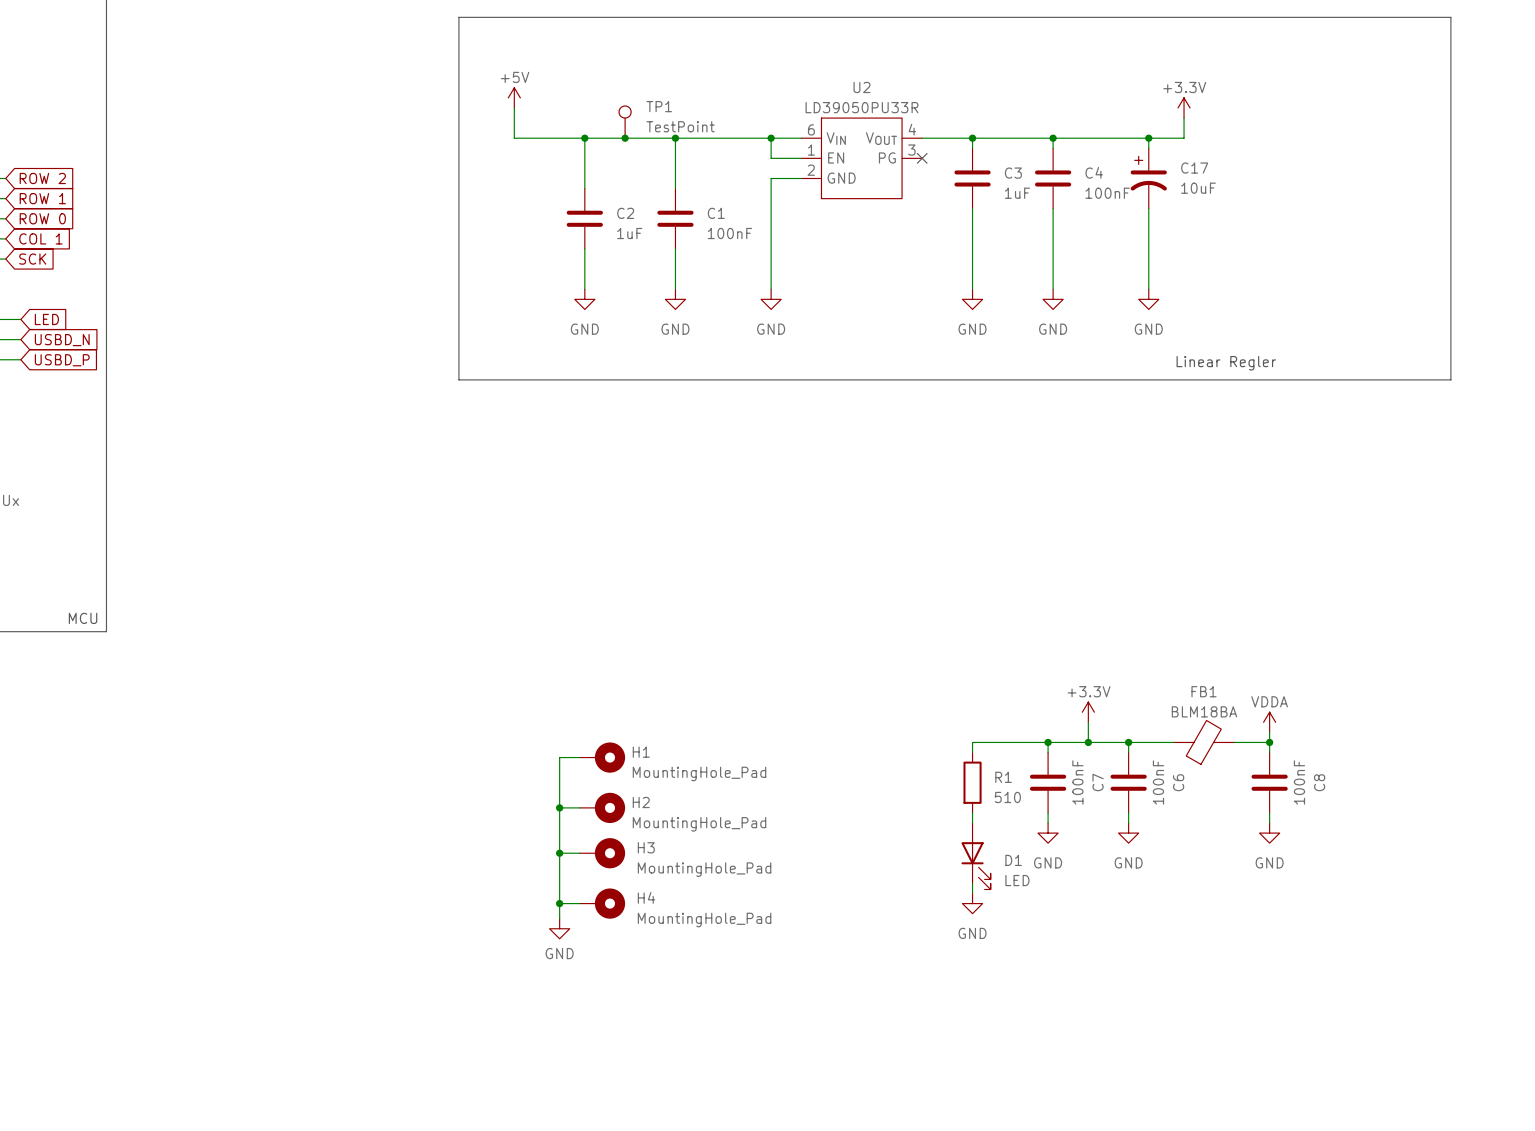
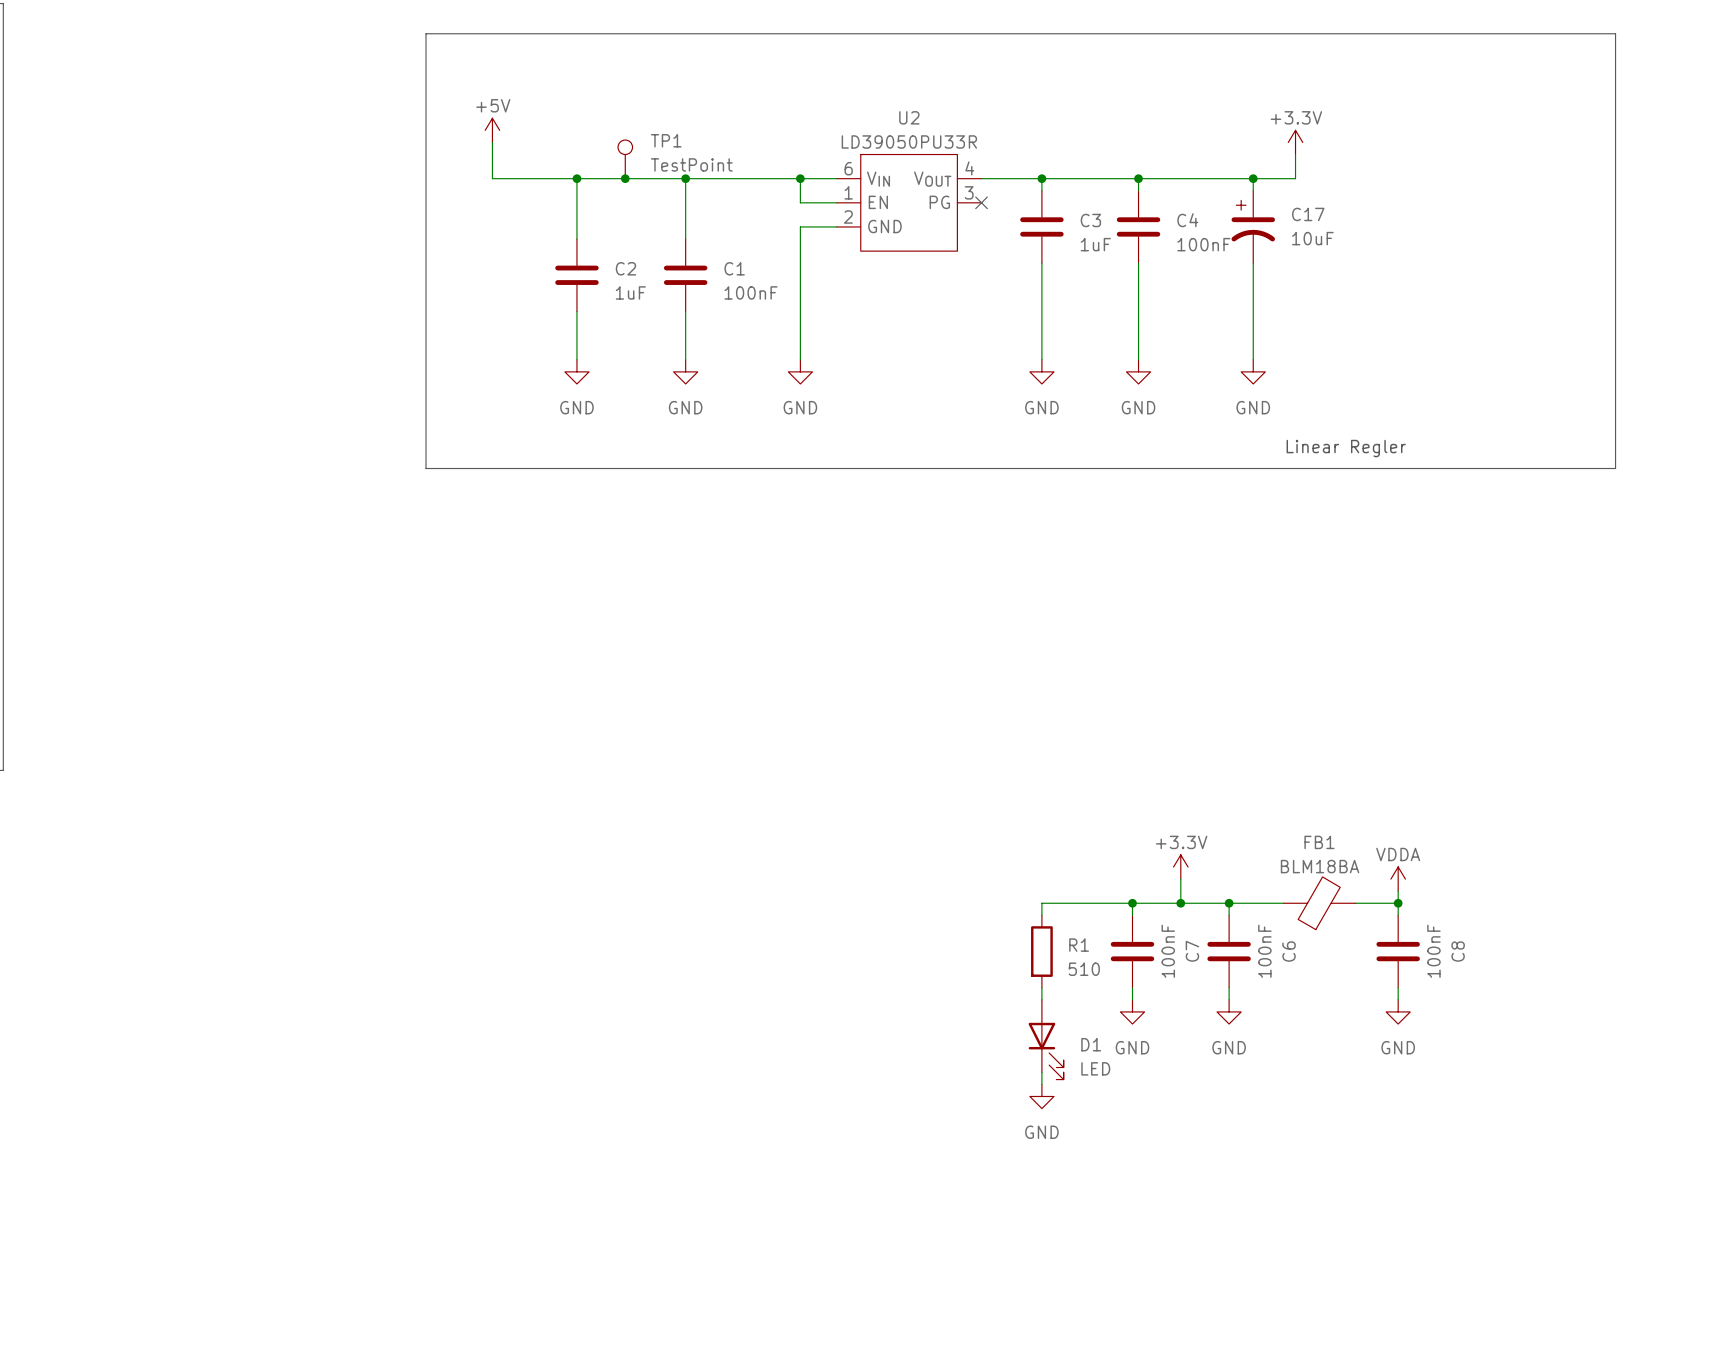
wire: (579, 757) (559, 757) (559, 918) -> none
H1: MountingHole_Pad (602, 757) -> none
wire: (559, 807) (579, 807) -> none
junction: (559, 807) -> none
H2: MountingHole_Pad (602, 807) -> none
wire: (559, 853) (579, 853) -> none
junction: (559, 853) -> none
H3: MountingHole_Pad (602, 853) -> none
wire: (559, 903) (579, 903) -> none
junction: (559, 903) -> none
H4: MountingHole_Pad (602, 903) -> none
power symbol: GND (559, 928) -> none

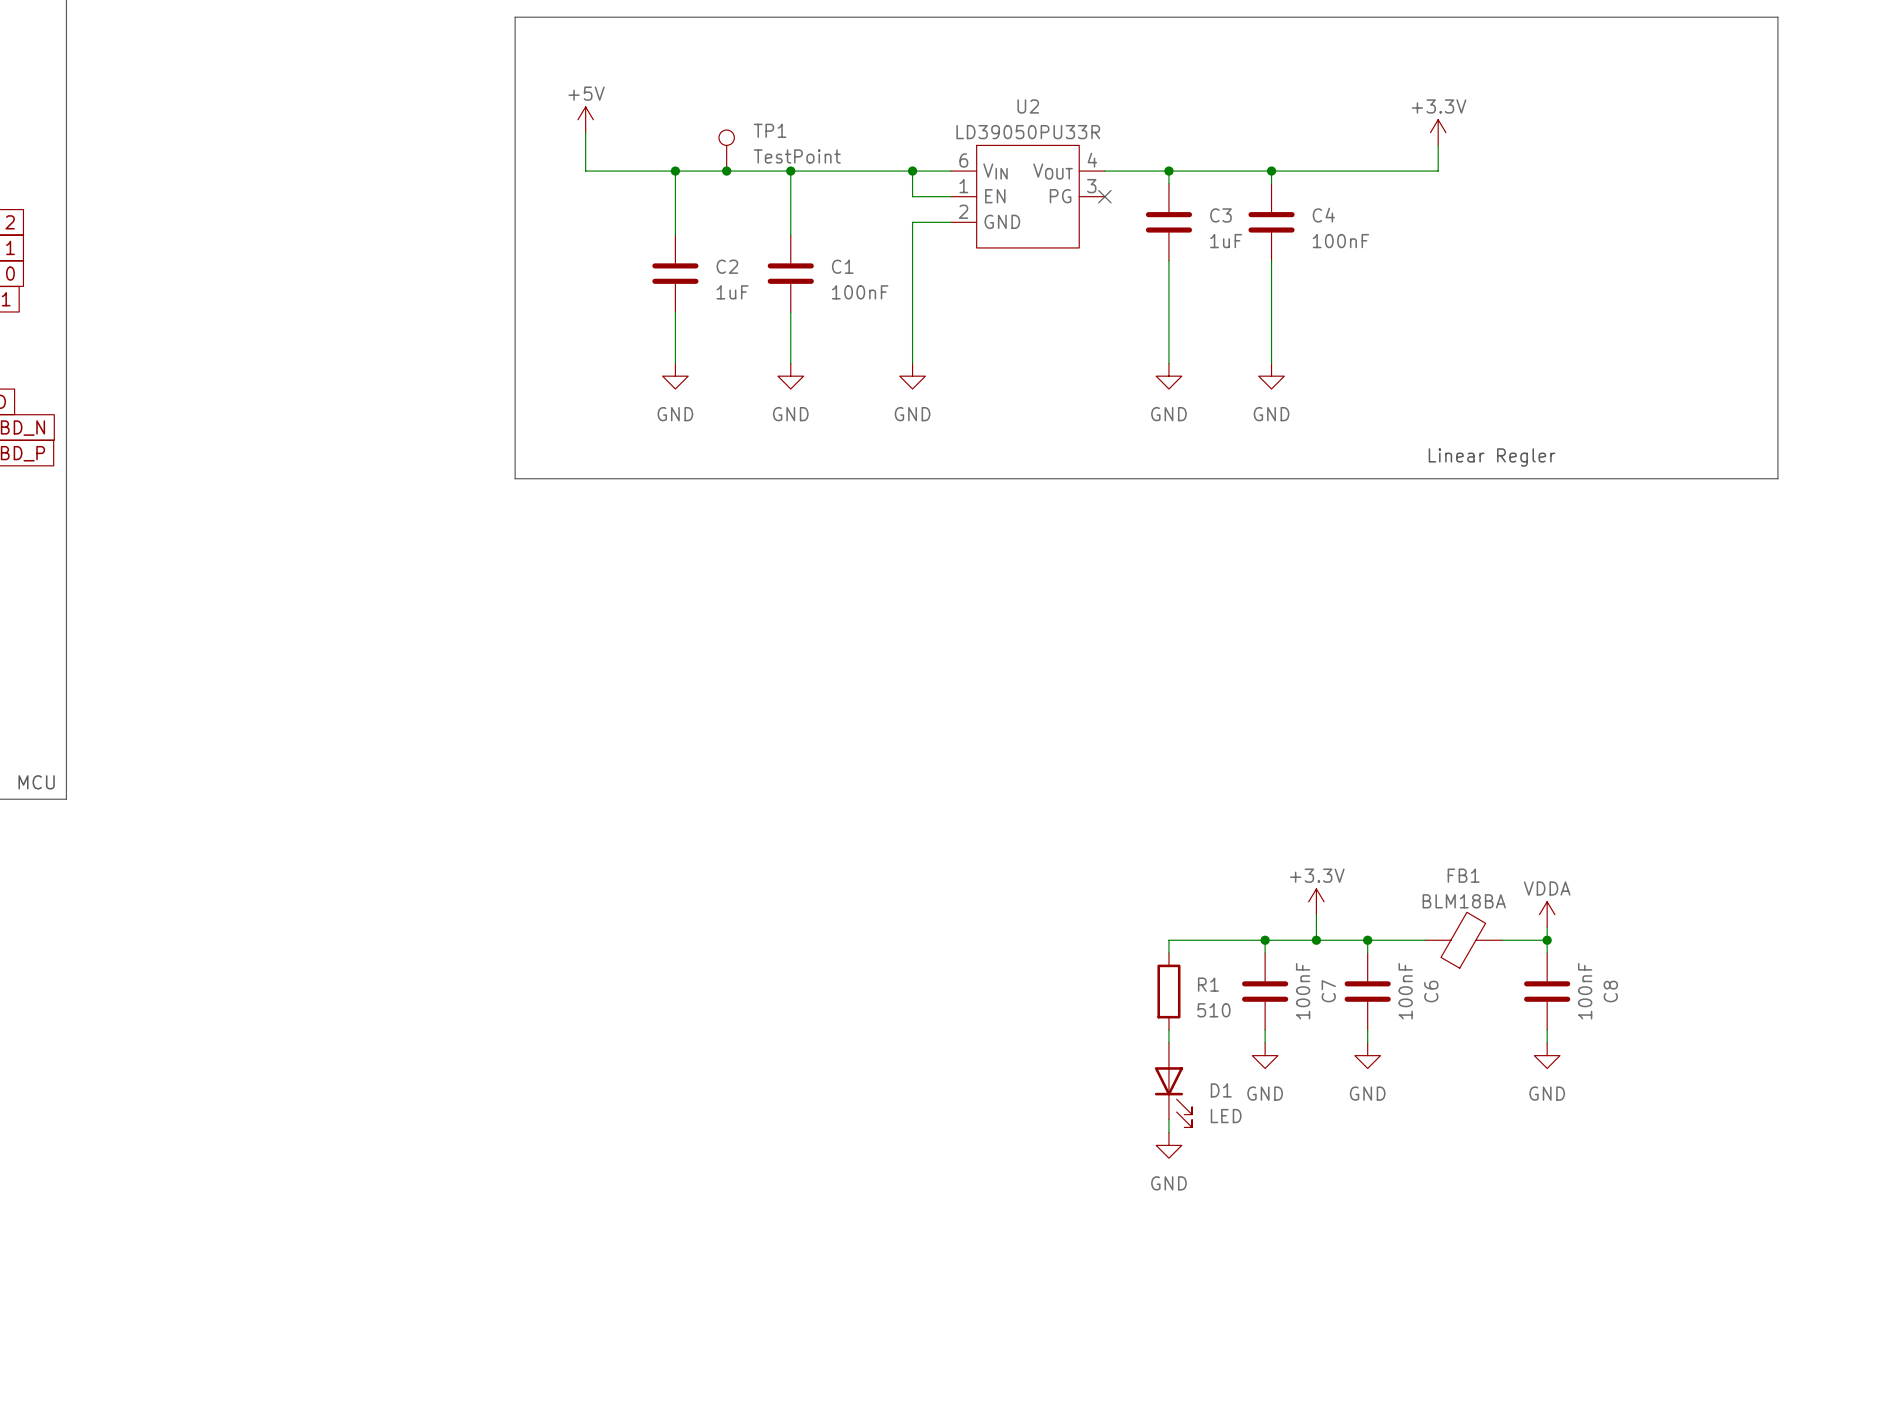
wire: (1253, 178) (1253, 190) -> none
junction: (1253, 178) -> none
C17: 10uF (1253, 226) -> none
wire: (1253, 263) (1253, 359) -> none
power symbol: GND (1253, 371) -> none

